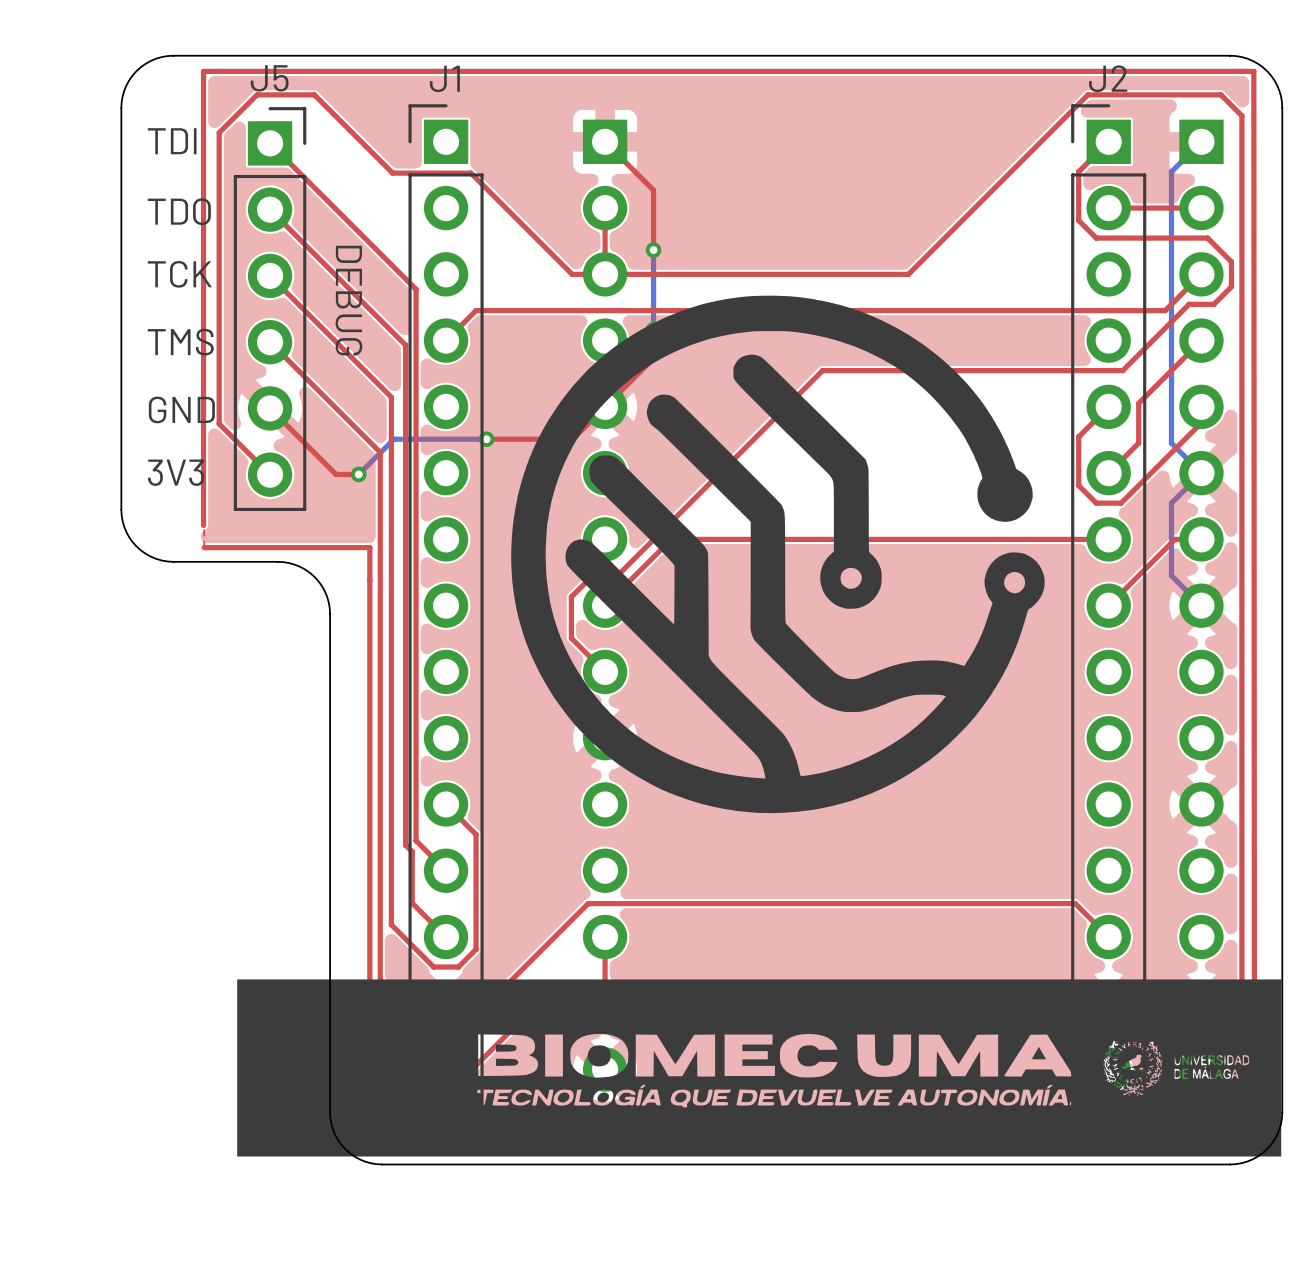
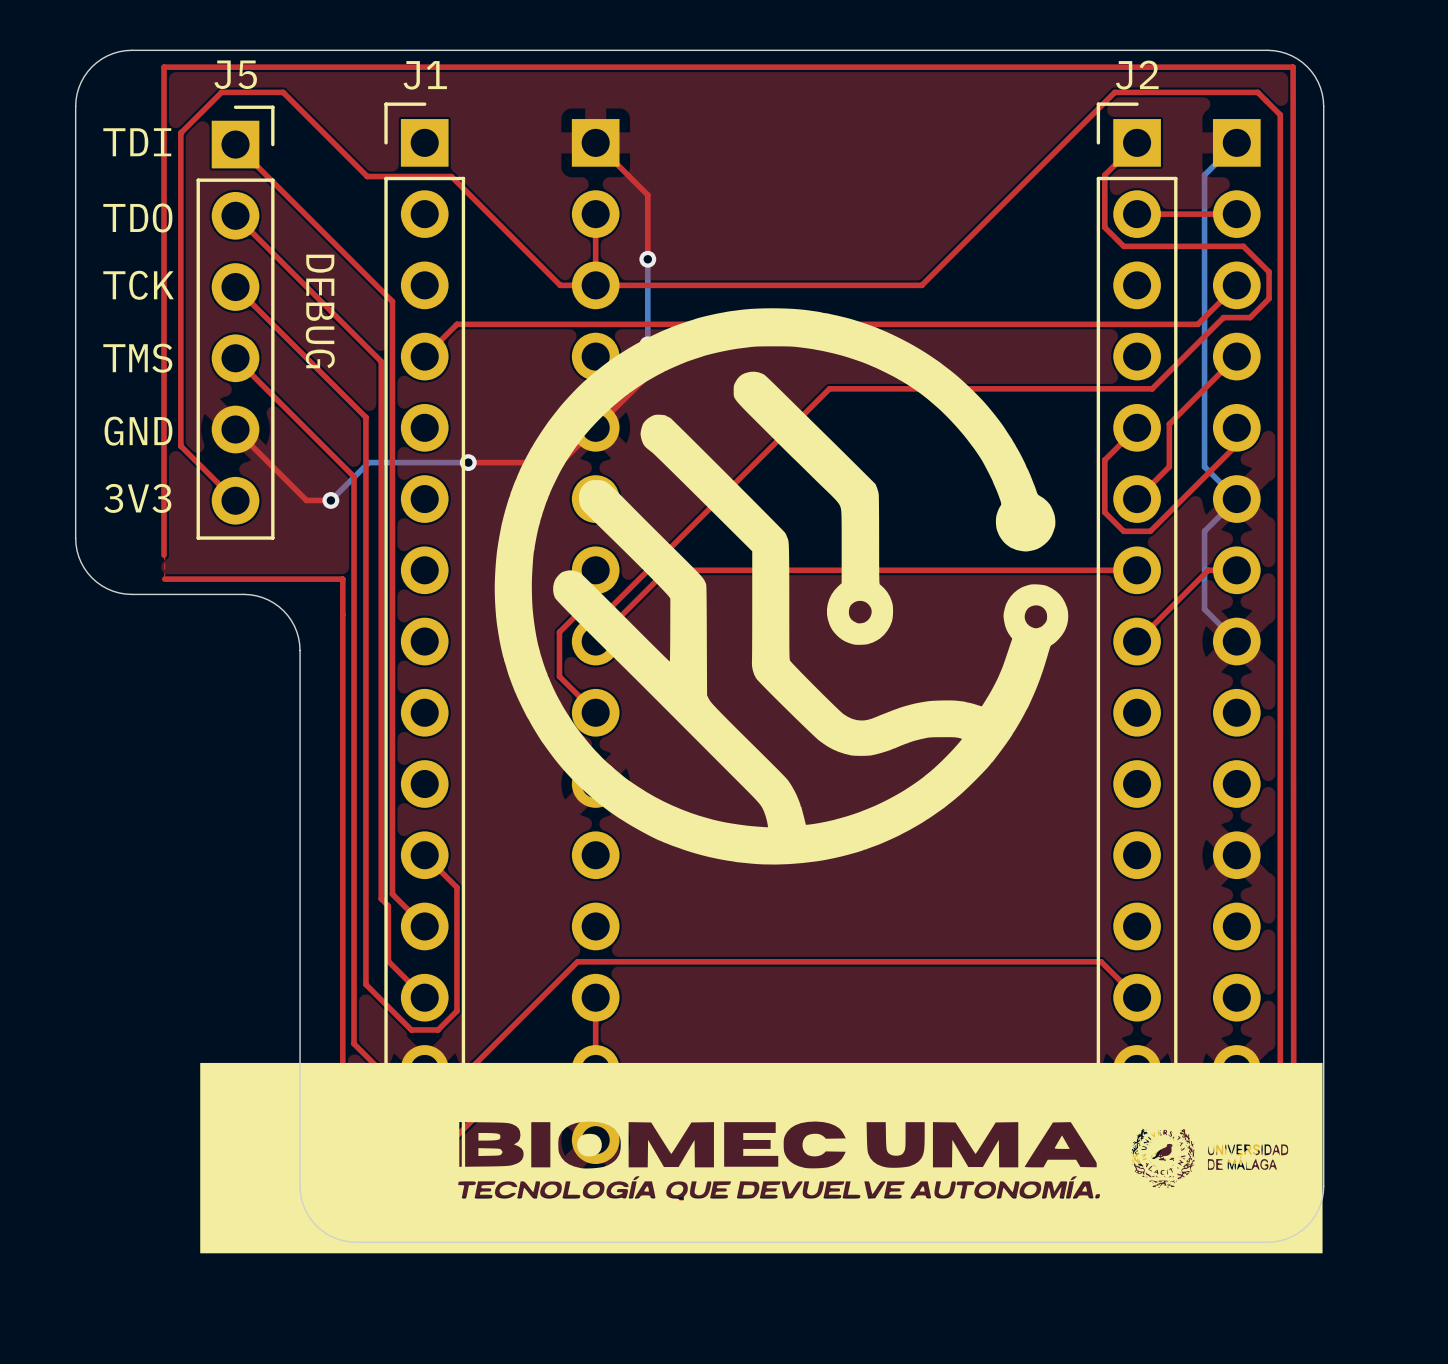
drawing position: (759, 1067) -> (761, 1158)

